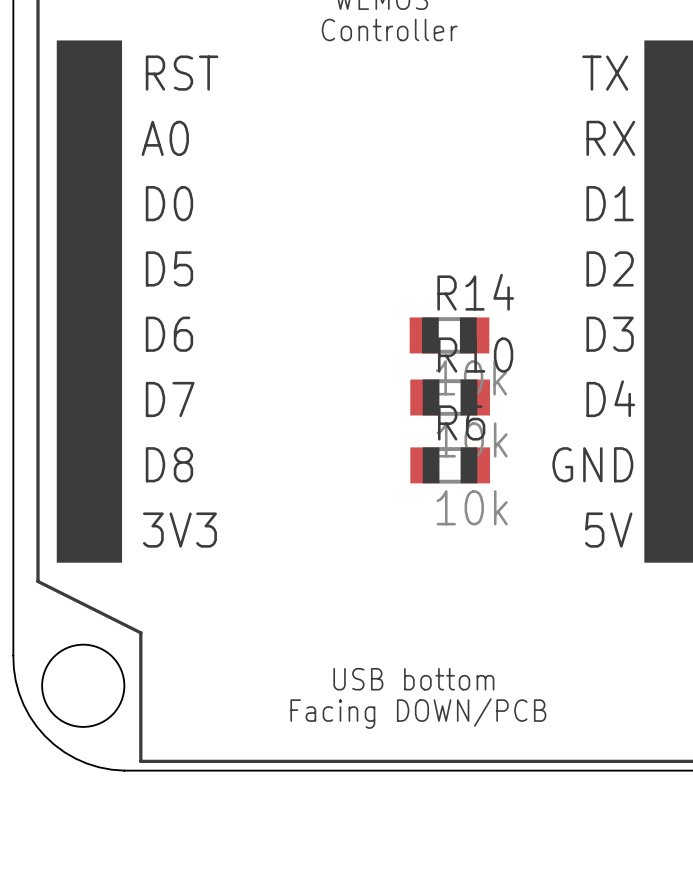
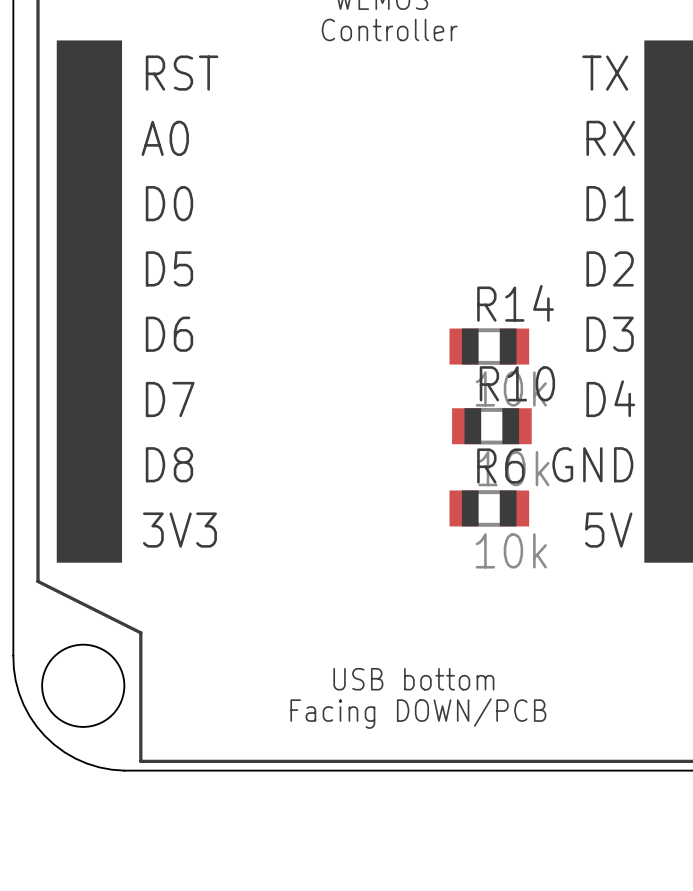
R14 position: (449, 335) -> (489, 346)
R10 position: (450, 397) -> (491, 426)
R6 position: (450, 465) -> (489, 508)

